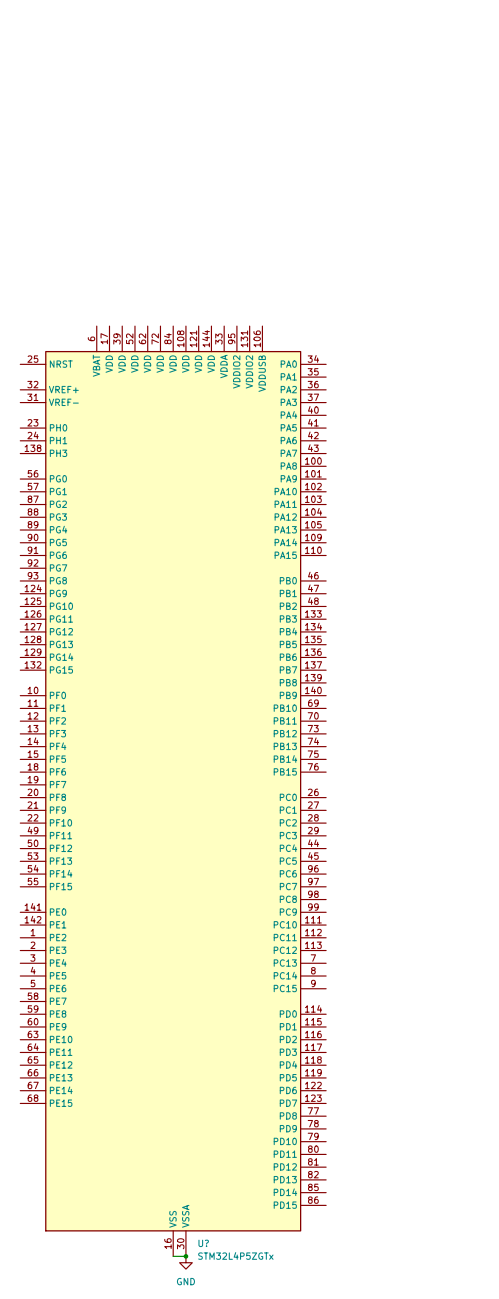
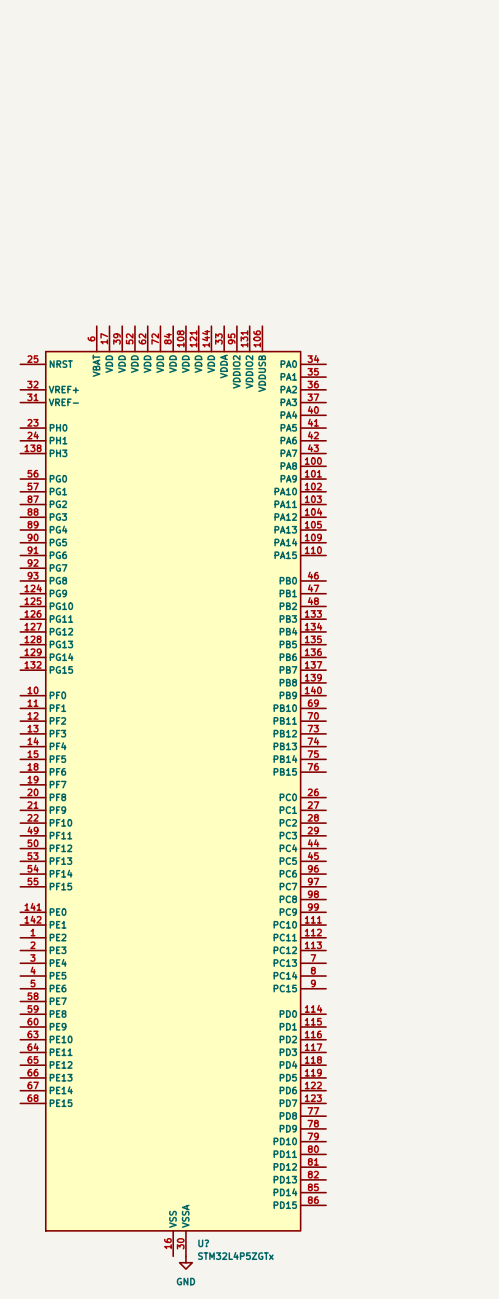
wire: (173, 1256) (185, 1256) -> none
junction: (185, 1256) -> none

